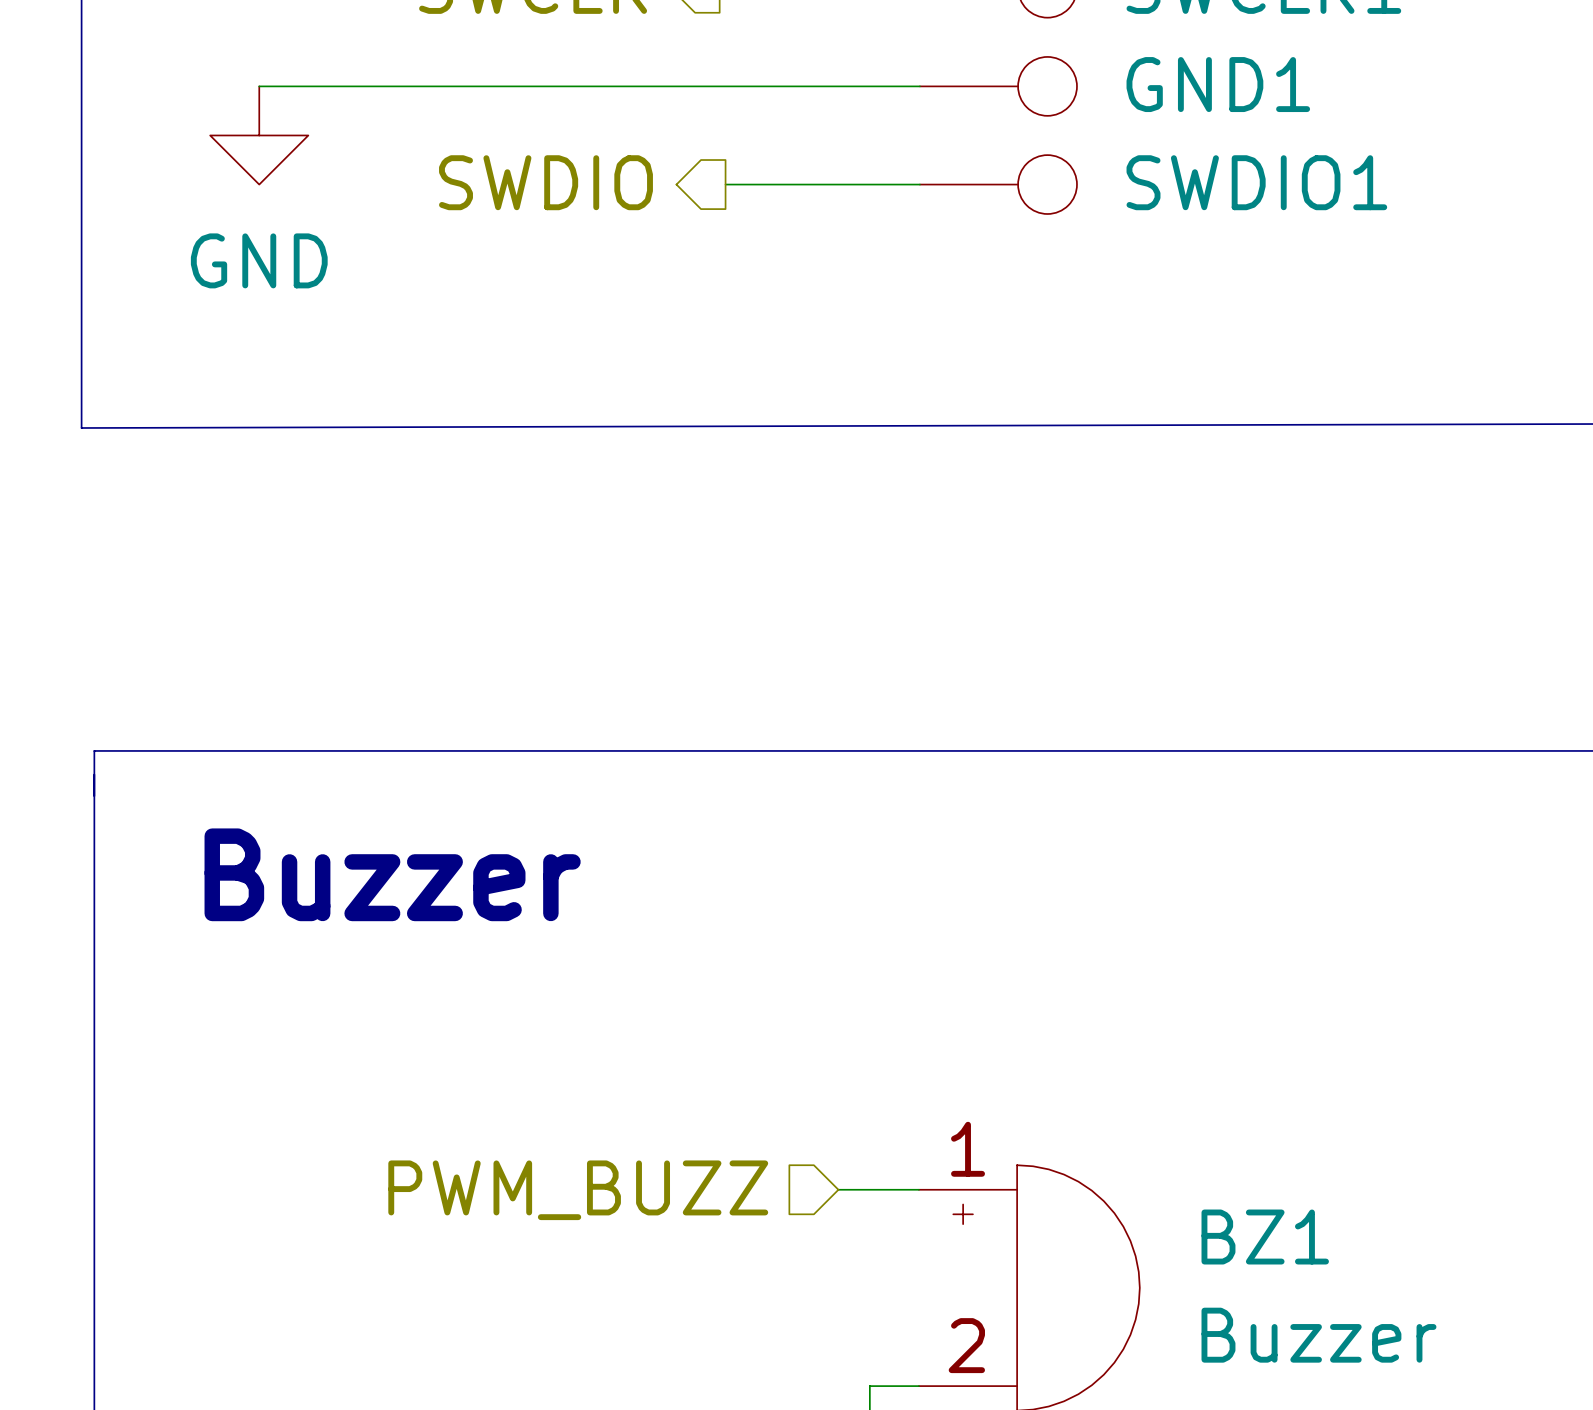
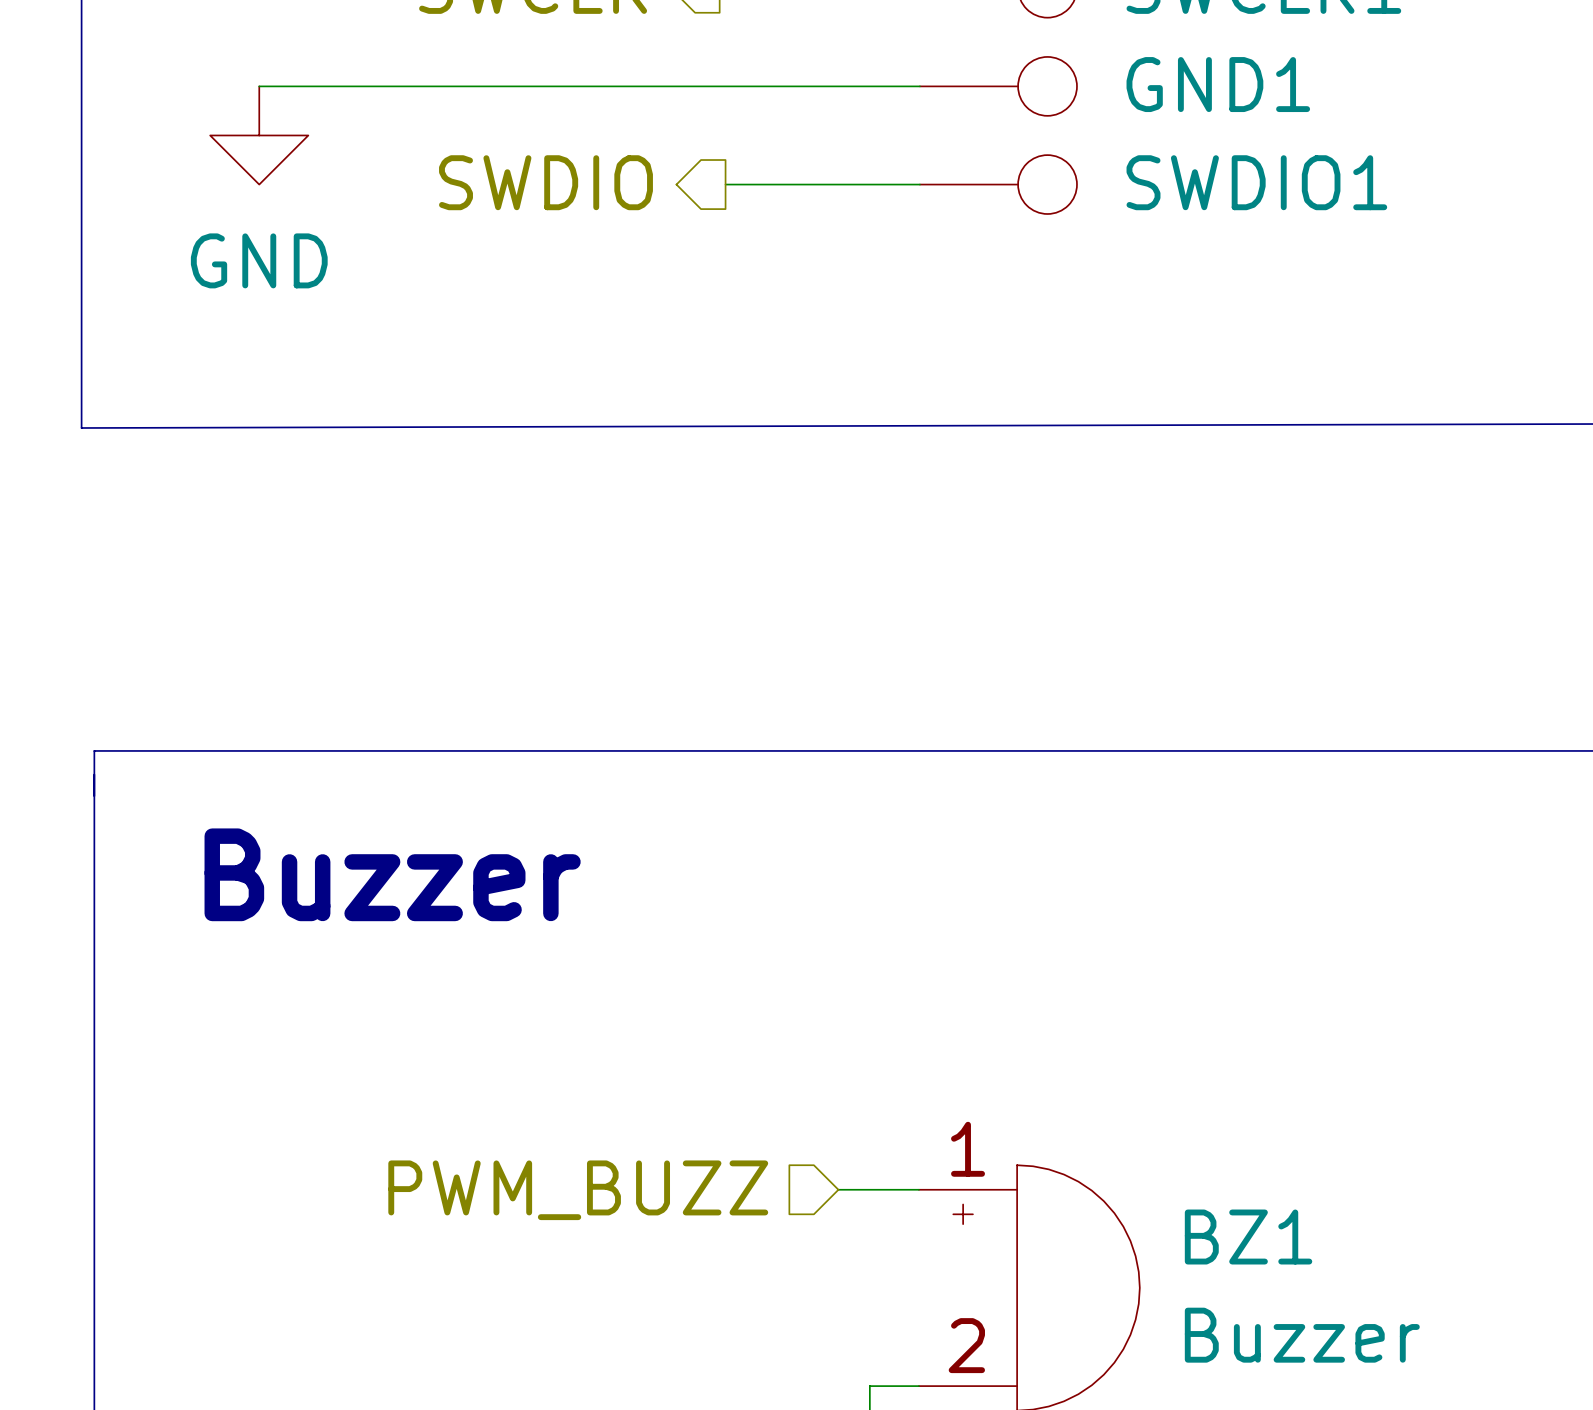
BZ1 name position: BZ1 (1265, 1237) -> BZ1 (1248, 1237)
BZ1 value position: Buzzer (1318, 1335) -> Buzzer (1302, 1335)

